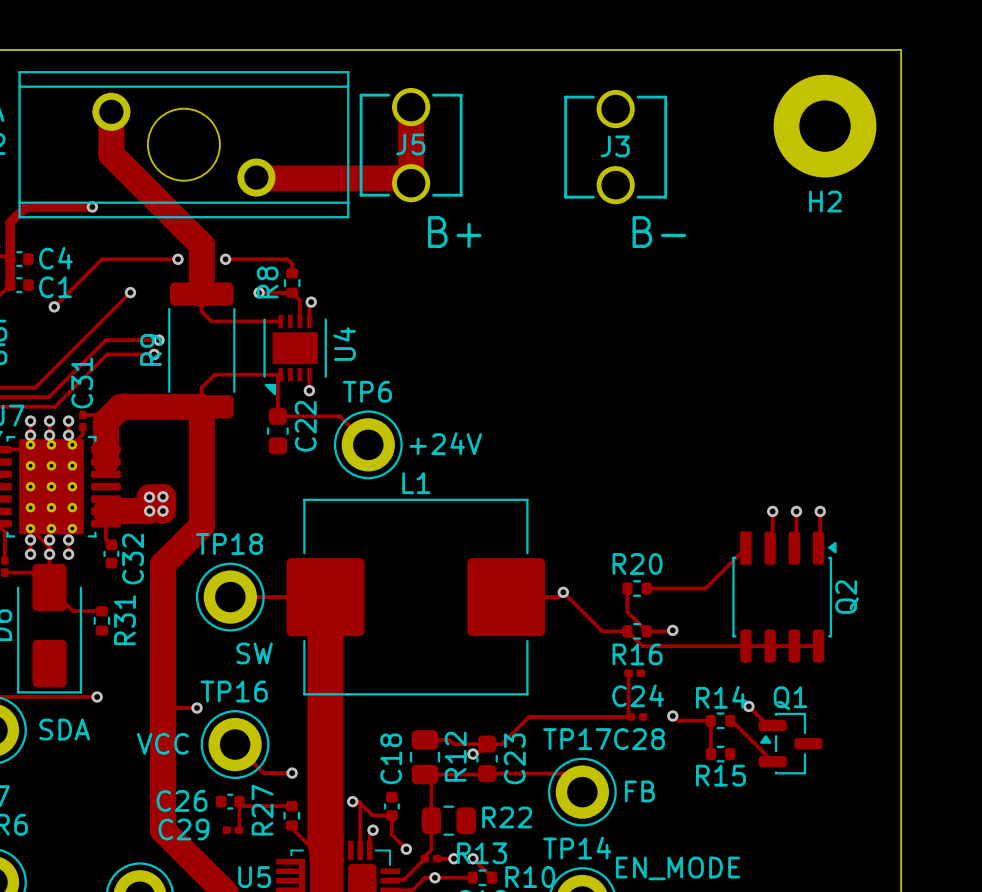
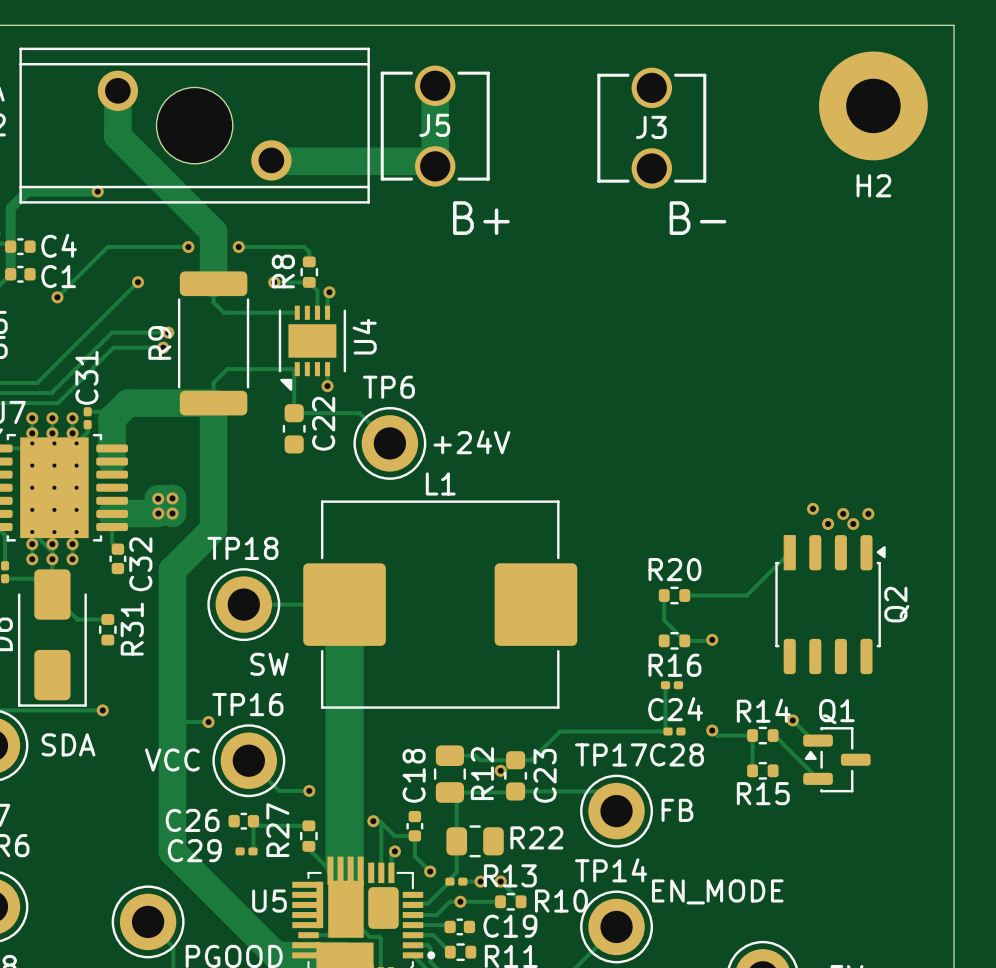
via: none -> (812, 508)
track: (772, 511) (772, 545) -> none
via: (772, 511) -> none
track: (796, 511) (796, 545) -> none
track: (820, 511) (820, 546) -> none
via: none -> (828, 524)
via: none -> (853, 524)
via: (563, 592) -> none
track: (539, 597) (558, 597) (563, 592) (602, 631) (627, 631) (642, 646) (818, 646) -> none

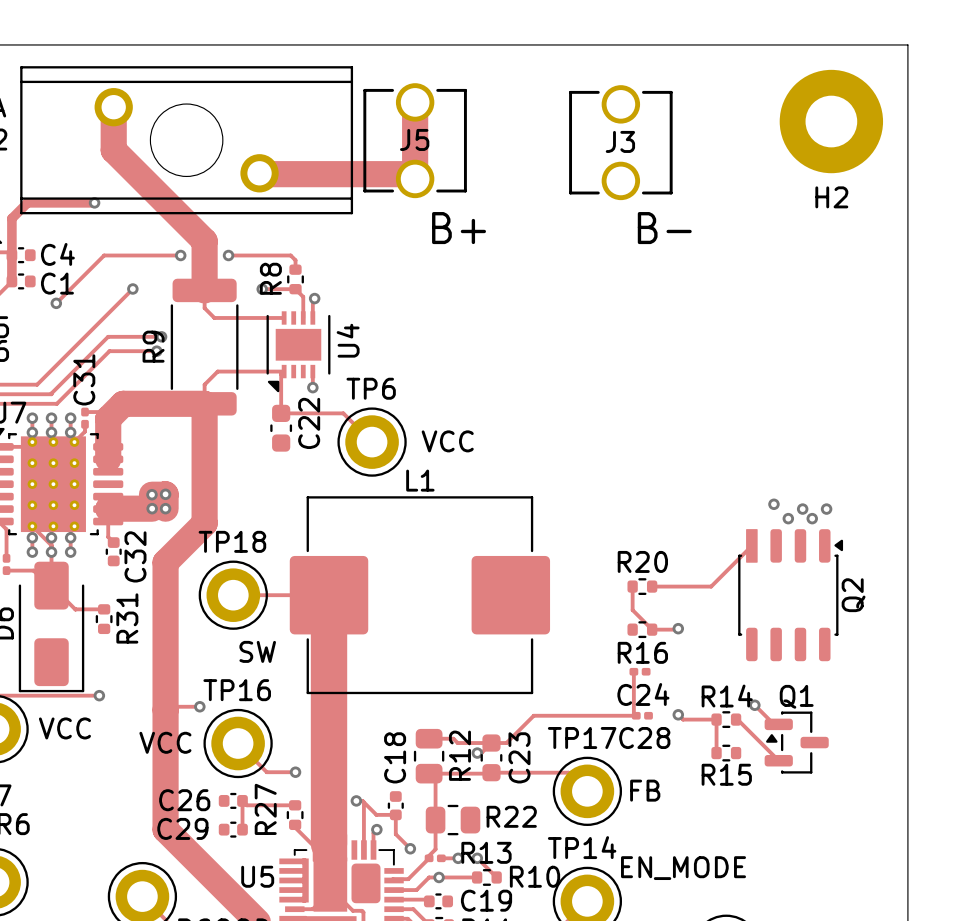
TP6 text: +24V (471, 442) -> VCC (447, 441)
part text: SDA (68, 744) -> VCC (64, 728)
C29 footprint: [235, 847, 258, 856] -> [218, 821, 248, 838]

